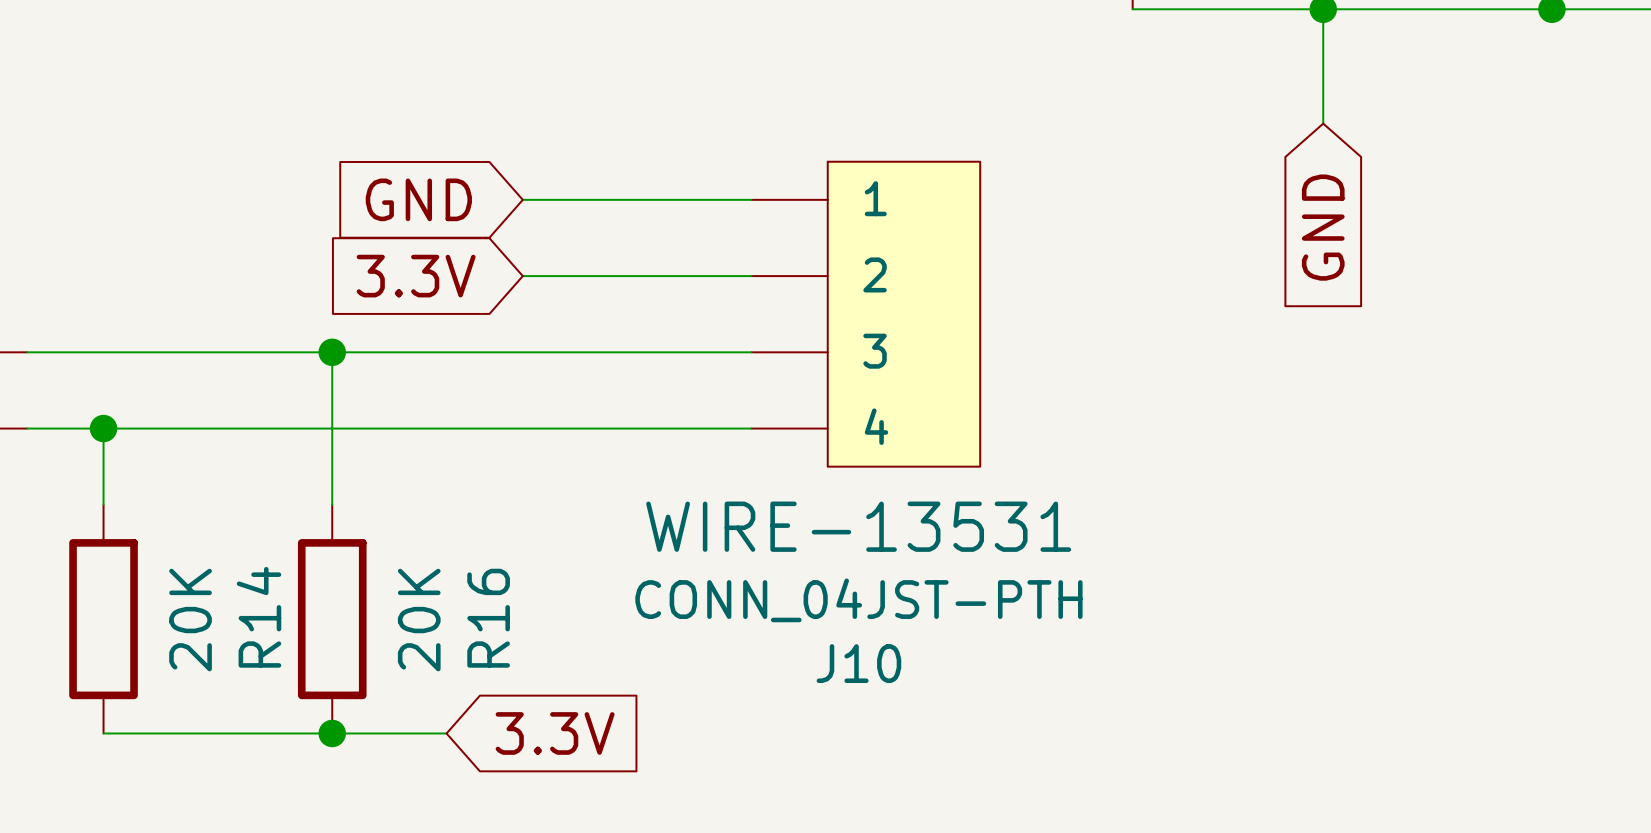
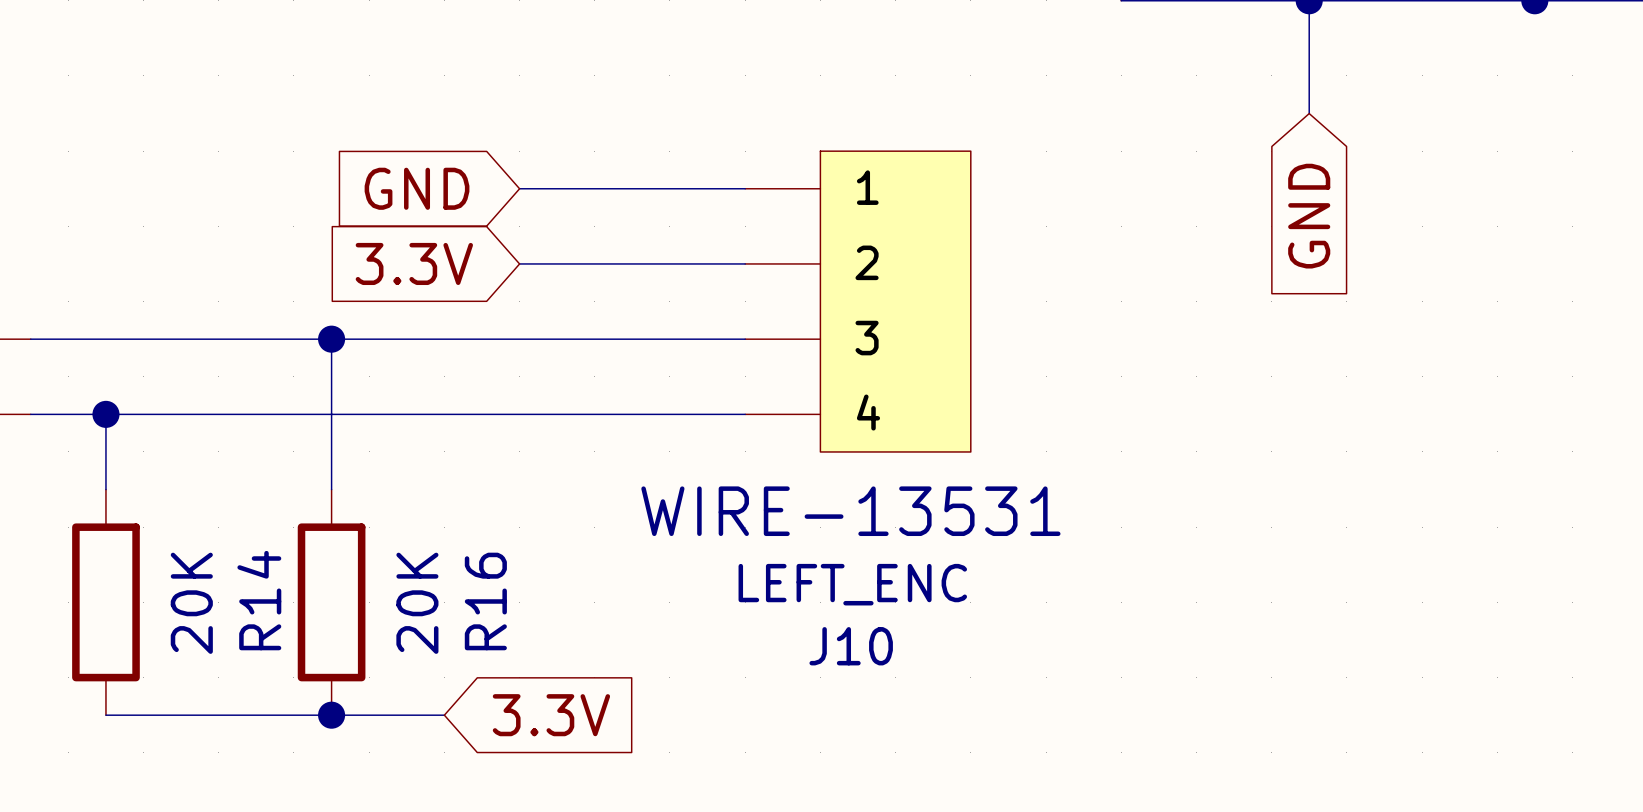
J10 value: CONN_04JST-PTH (858, 600) -> LEFT_ENC (852, 584)

